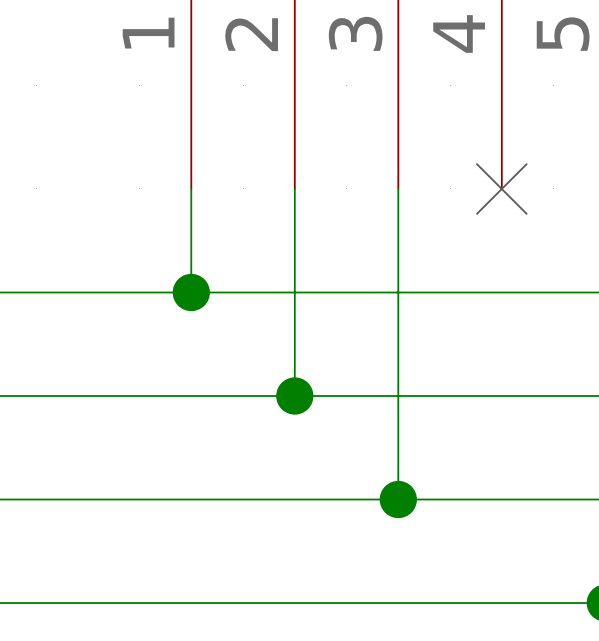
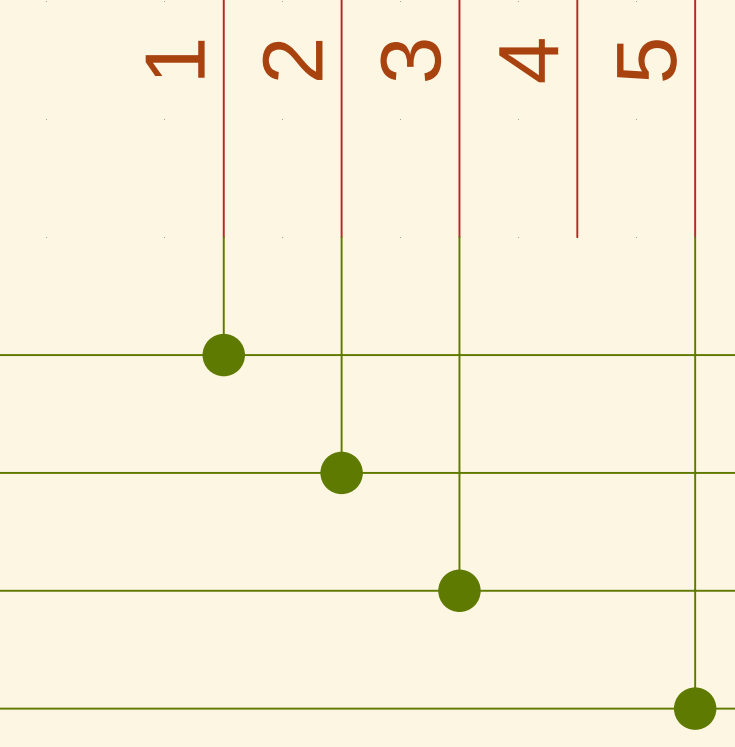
no-connect mark: (501, 188) -> none

